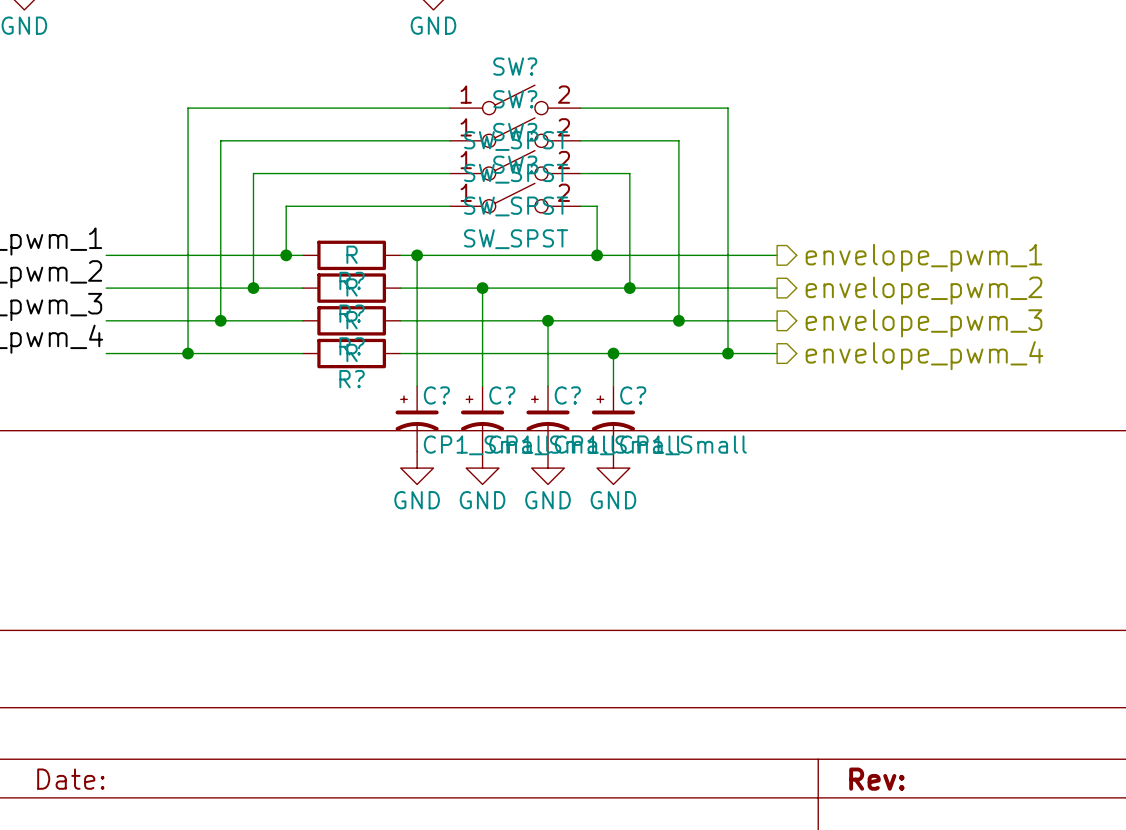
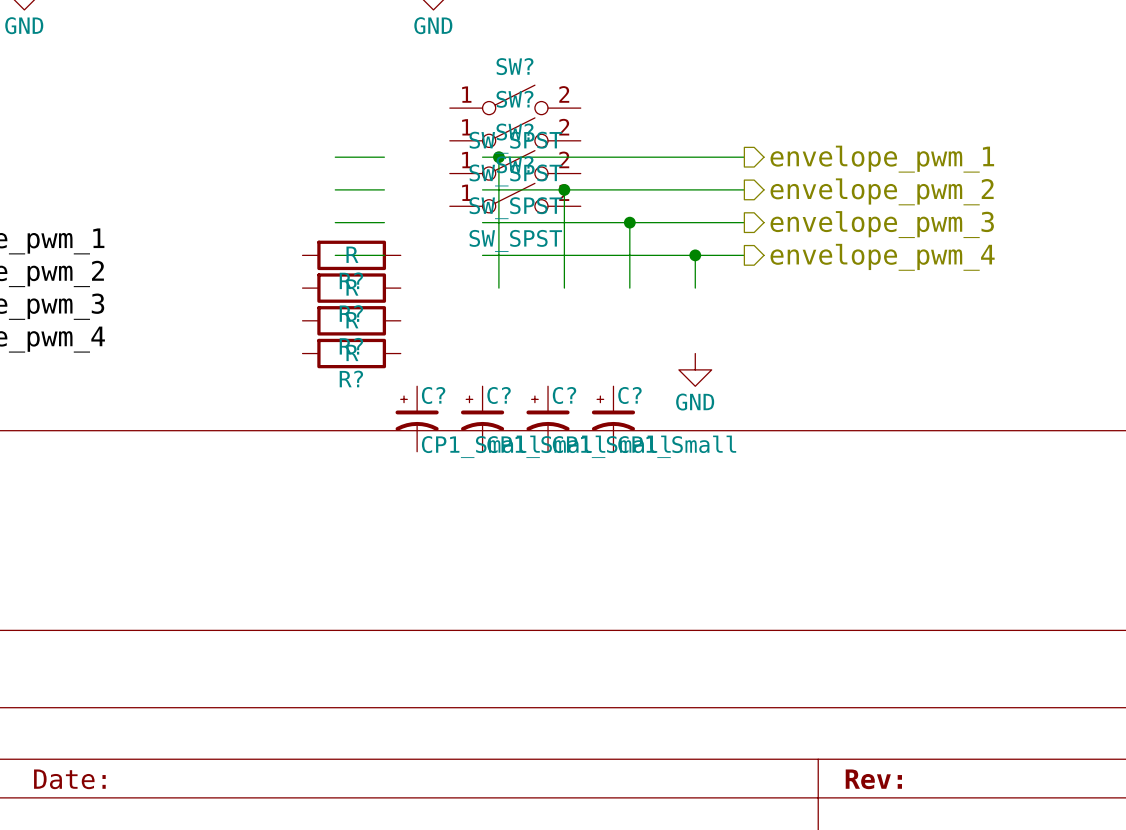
wire: (449, 108) (188, 108) (188, 353) -> none
wire: (580, 108) (728, 108) (728, 353) -> none
wire: (449, 140) (220, 140) (220, 320) -> none
wire: (580, 140) (678, 140) (678, 320) -> none
wire: none -> (335, 157) (384, 157)
wire: none -> (482, 157) (744, 157)
junction: none -> (498, 157)
wire: (449, 173) (253, 173) (253, 288) -> none
wire: (580, 173) (629, 173) (629, 222) -> none
wire: none -> (335, 189) (384, 189)
wire: none -> (482, 189) (744, 189)
junction: none -> (564, 189)
wire: (449, 206) (286, 206) (286, 255) -> none
wire: (580, 206) (597, 206) (597, 255) -> none
wire: none -> (335, 222) (384, 222)
wire: none -> (482, 222) (744, 222)
junction: none -> (629, 222)
wire: (106, 255) (302, 255) -> none
junction: (286, 255) -> none
wire: none -> (335, 255) (384, 255)
wire: (400, 255) (482, 255) -> none
wire: (417, 255) (417, 386) -> (498, 157) (498, 288)
junction: (417, 255) -> none
junction: (597, 255) -> none
junction: none -> (695, 255)
wire: (744, 255) (777, 255) -> none
hierarchical label position: envelope_pwm_1 (924, 257) -> envelope_pwm_1 (882, 159)
wire: (106, 288) (302, 288) -> none
junction: (253, 288) -> none
wire: (400, 288) (777, 288) -> none
wire: (482, 288) (482, 386) -> (564, 189) (564, 288)
junction: (482, 288) -> none
junction: (629, 288) -> none
hierarchical label position: envelope_pwm_2 (924, 290) -> envelope_pwm_2 (882, 191)
wire: (106, 320) (302, 320) -> none
junction: (220, 320) -> none
wire: (400, 320) (777, 320) -> none
wire: (548, 320) (548, 386) -> none
junction: (548, 320) -> none
junction: (678, 320) -> none
hierarchical label position: envelope_pwm_3 (924, 323) -> envelope_pwm_3 (882, 224)
wire: (106, 353) (302, 353) -> none
junction: (188, 353) -> none
wire: (400, 353) (777, 353) -> none
wire: (613, 353) (613, 386) -> (695, 255) (695, 288)
junction: (613, 353) -> none
junction: (728, 353) -> none
hierarchical label position: envelope_pwm_4 (924, 355) -> envelope_pwm_4 (882, 257)
power symbol: none -> GND (695, 369)
power symbol: GND (417, 468) -> none
power symbol: GND (482, 468) -> none
power symbol: GND (548, 468) -> none
power symbol: GND (613, 468) -> none

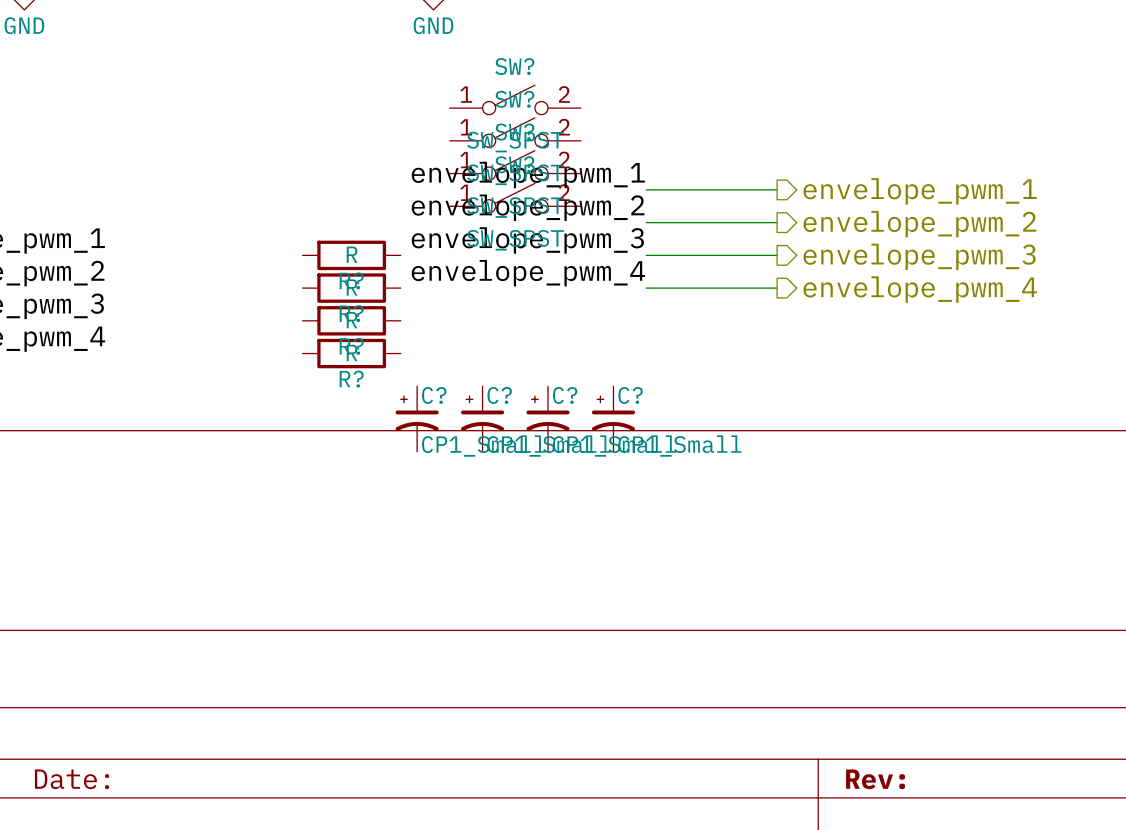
wire: (335, 157) (384, 157) -> none
wire: (482, 157) (744, 157) -> none
wire: (498, 157) (498, 288) -> none
junction: (498, 157) -> none
hierarchical label position: envelope_pwm_1 (882, 159) -> envelope_pwm_1 (920, 191)
label: none -> envelope_pwm_1 (528, 175)
wire: (335, 189) (384, 189) -> none
wire: (482, 189) (646, 189) -> none
wire: (564, 189) (564, 288) -> none
junction: (564, 189) -> none
wire: none -> (744, 189) (777, 189)
hierarchical label position: envelope_pwm_2 (882, 191) -> envelope_pwm_2 (919, 224)
label: none -> envelope_pwm_2 (528, 207)
wire: (335, 222) (384, 222) -> none
wire: (482, 222) (646, 222) -> none
wire: (629, 222) (629, 288) -> none
junction: (629, 222) -> none
wire: none -> (744, 222) (777, 222)
hierarchical label position: envelope_pwm_3 (882, 224) -> envelope_pwm_3 (919, 256)
label: none -> envelope_pwm_3 (527, 240)
wire: (335, 255) (384, 255) -> none
wire: (482, 255) (646, 255) -> none
wire: (695, 255) (695, 288) -> none
junction: (695, 255) -> none
wire: none -> (744, 255) (777, 255)
hierarchical label position: envelope_pwm_4 (882, 257) -> envelope_pwm_4 (920, 289)
label: none -> envelope_pwm_4 (528, 273)
wire: none -> (646, 288) (777, 288)
power symbol: GND (695, 369) -> none

